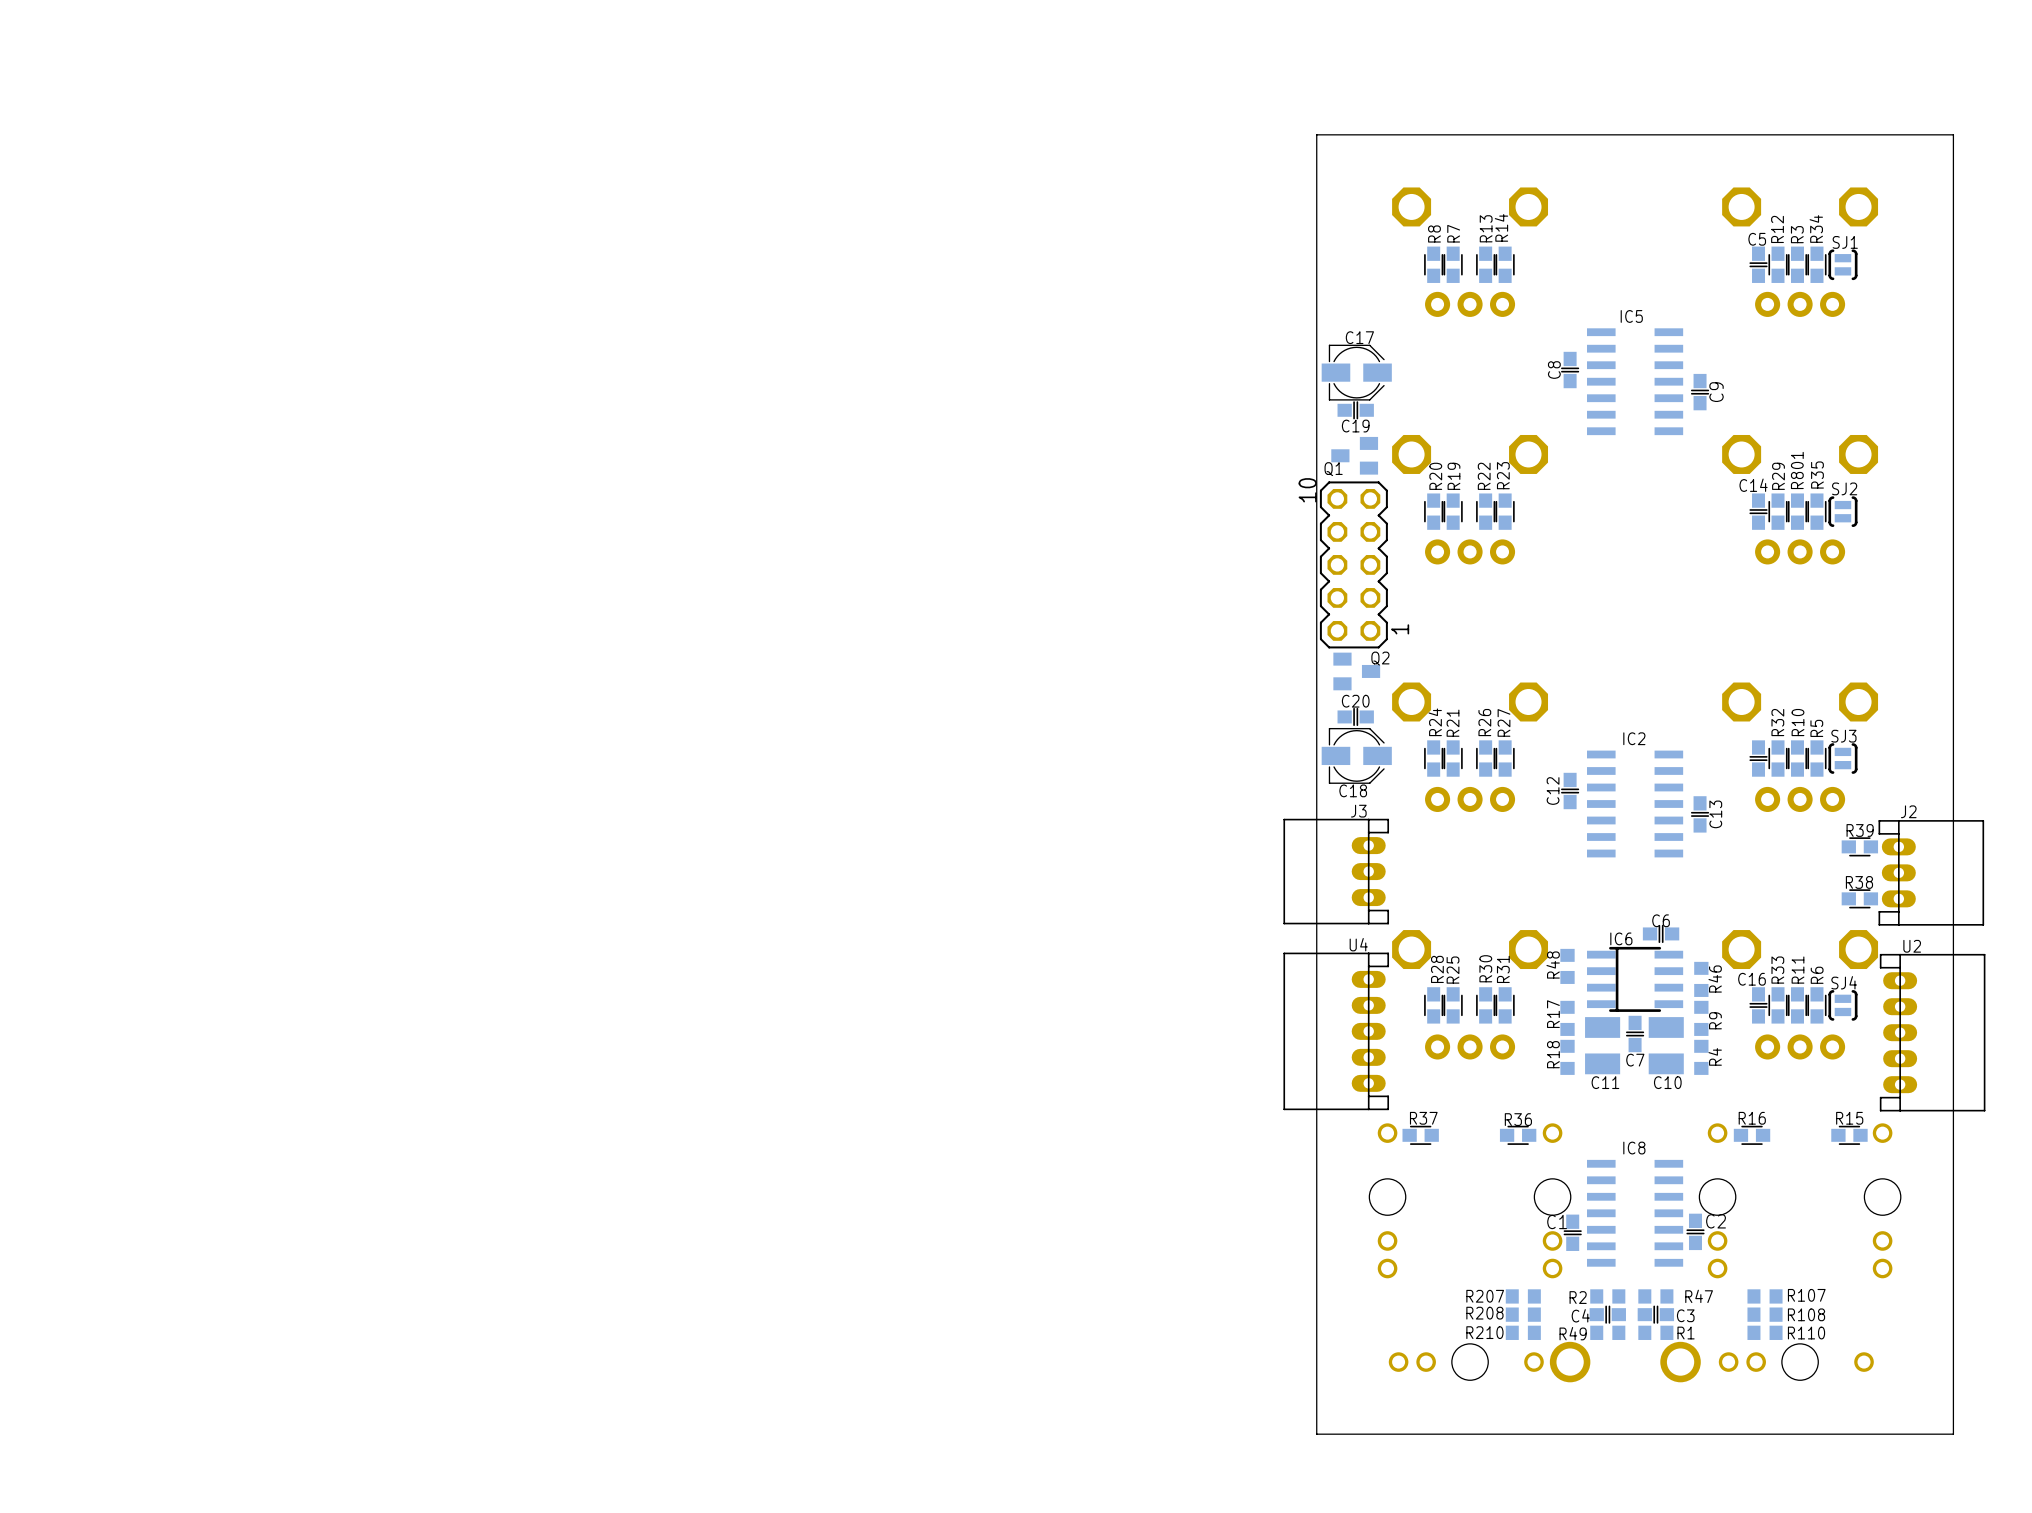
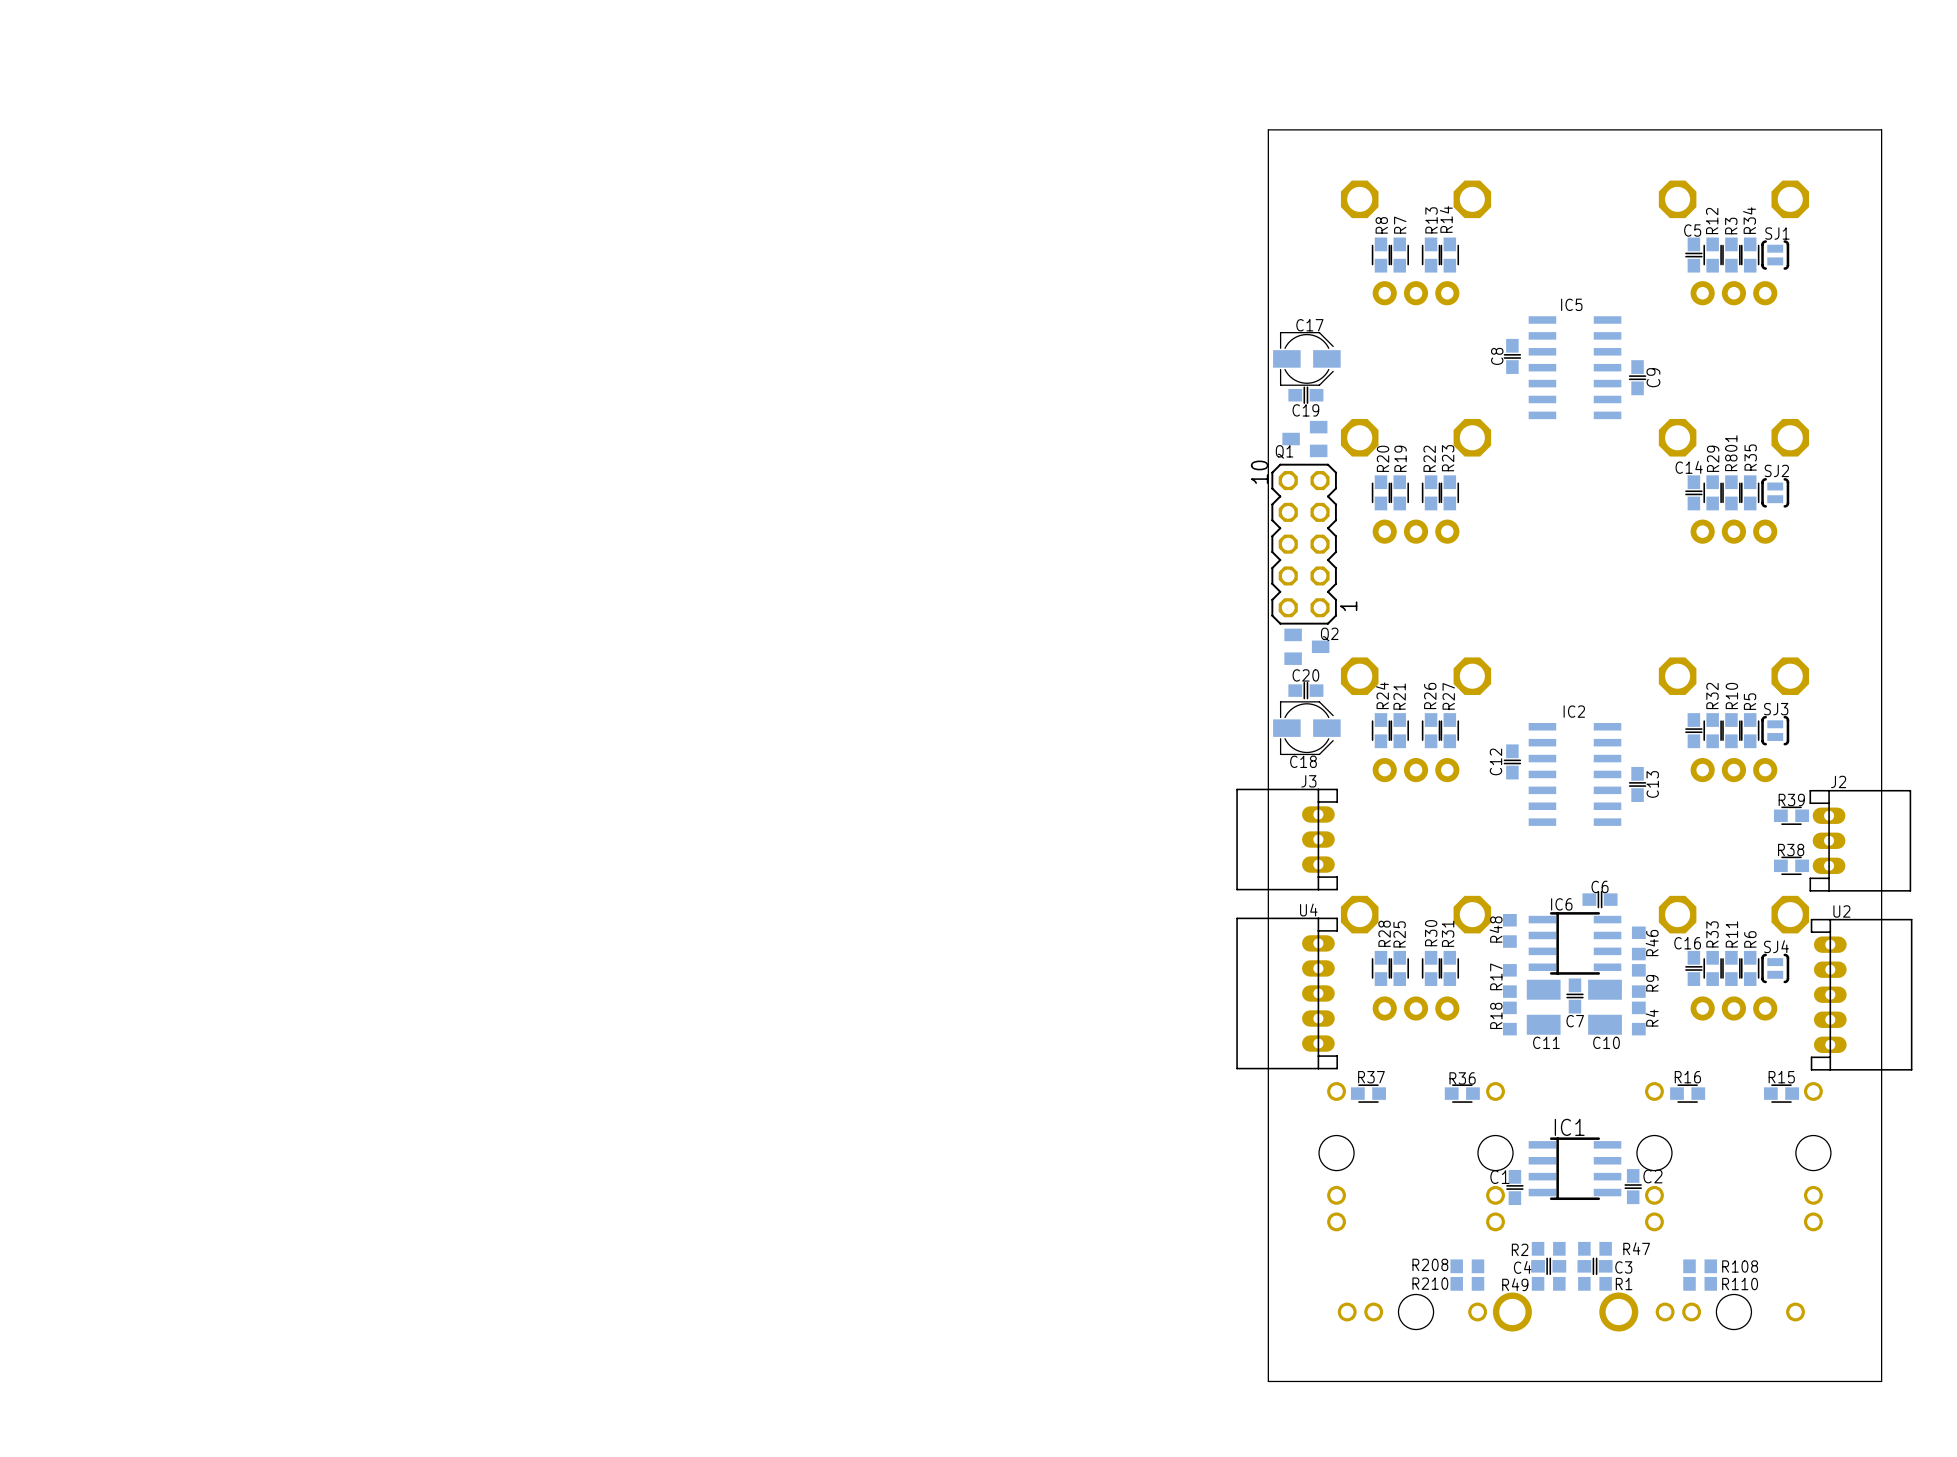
IC8: (1635, 1213) -> none
IC1: none -> (1574, 1168)
R207: (1523, 1296) -> none
R107: (1765, 1296) -> none

